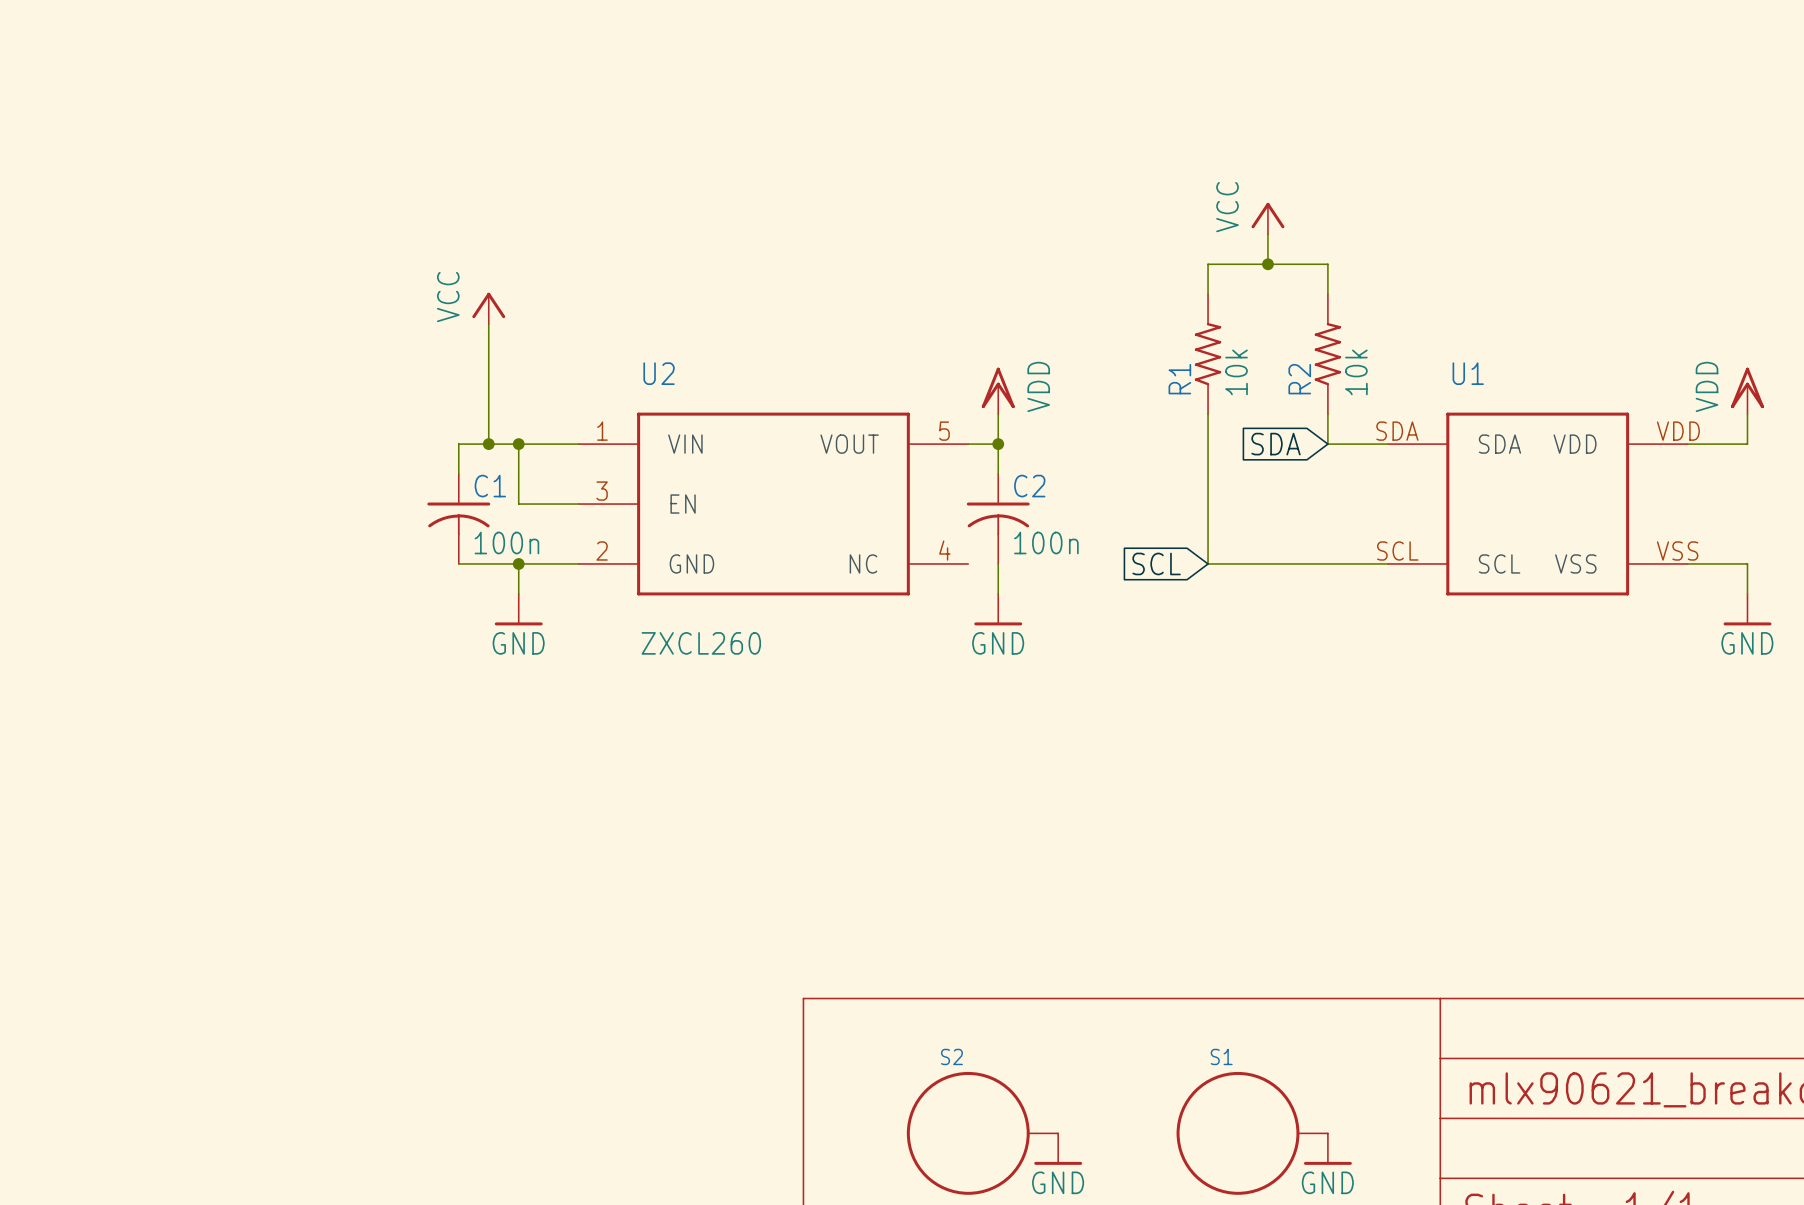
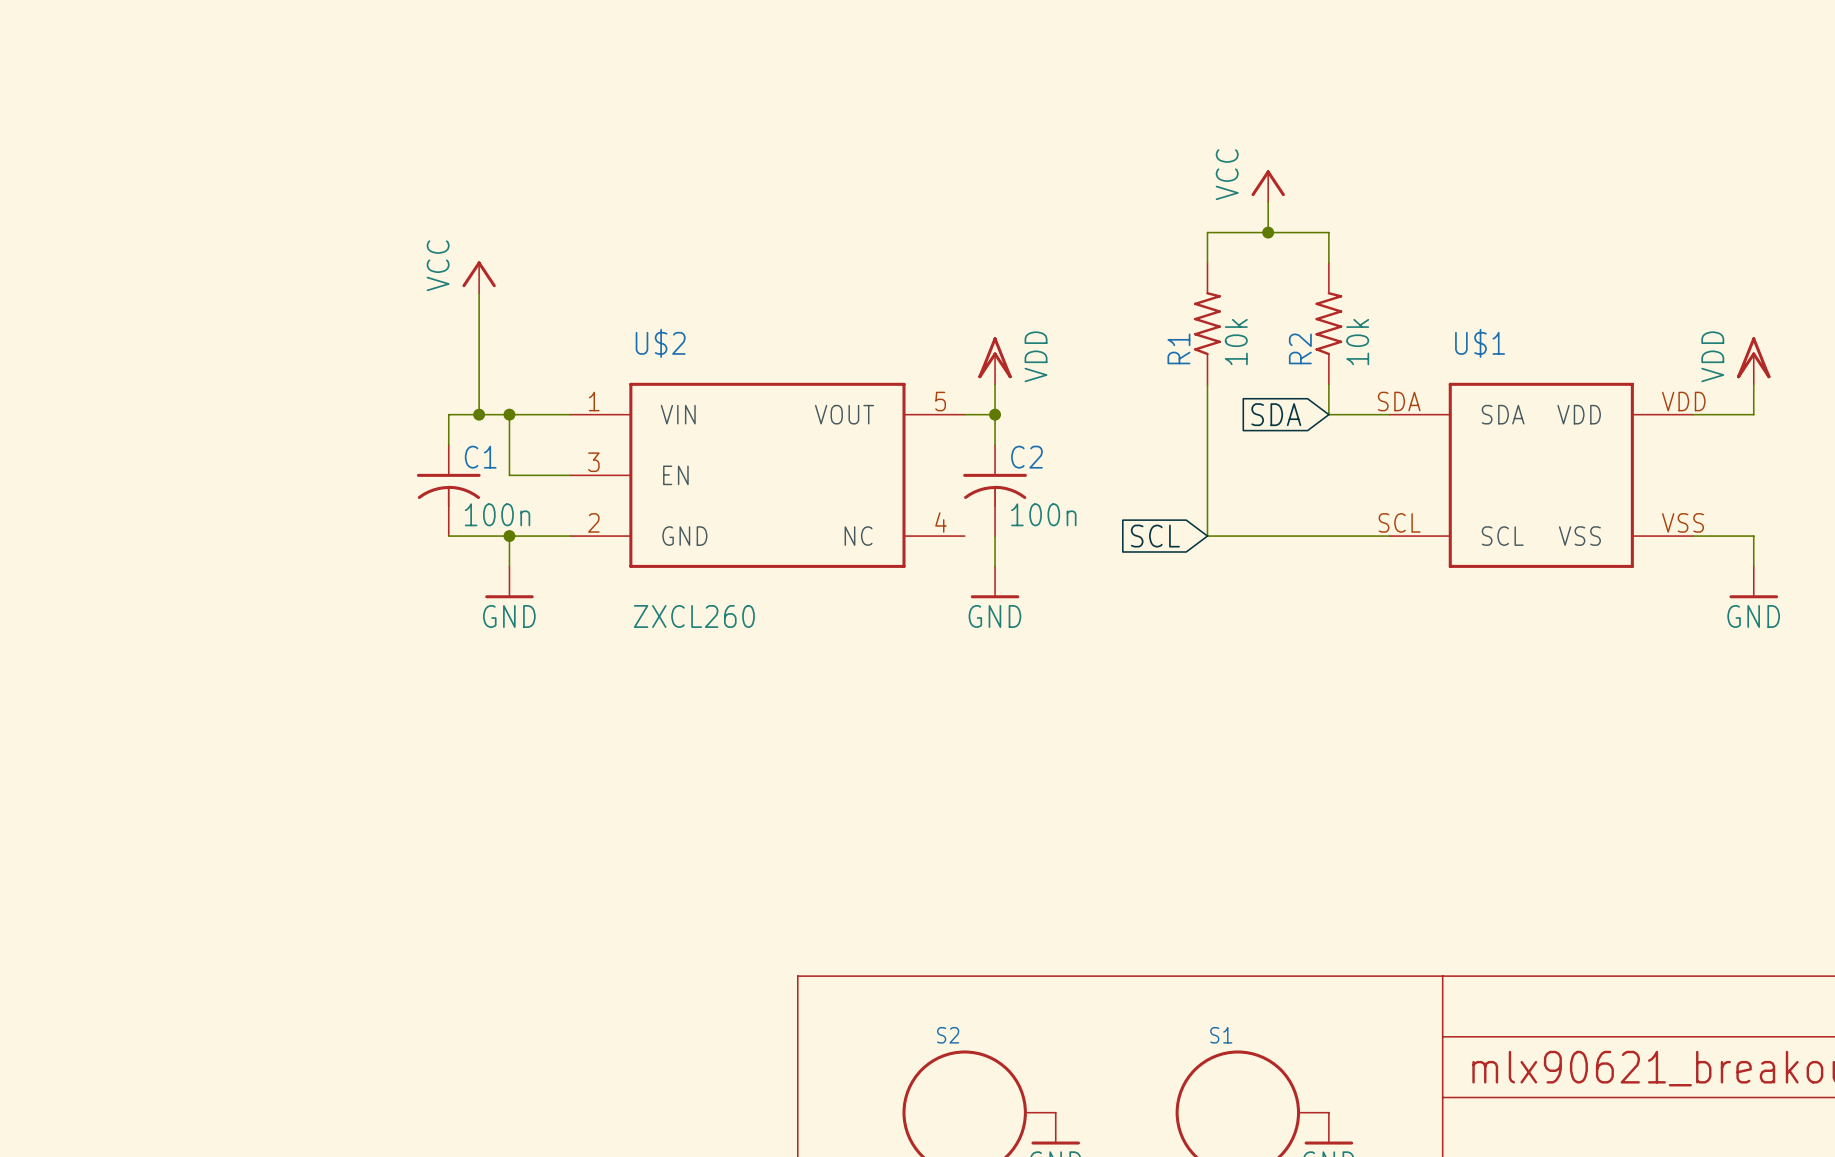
U2 name: U2 (659, 373) -> U$2 (660, 343)
U1 name: U1 (1468, 373) -> U$1 (1480, 343)

